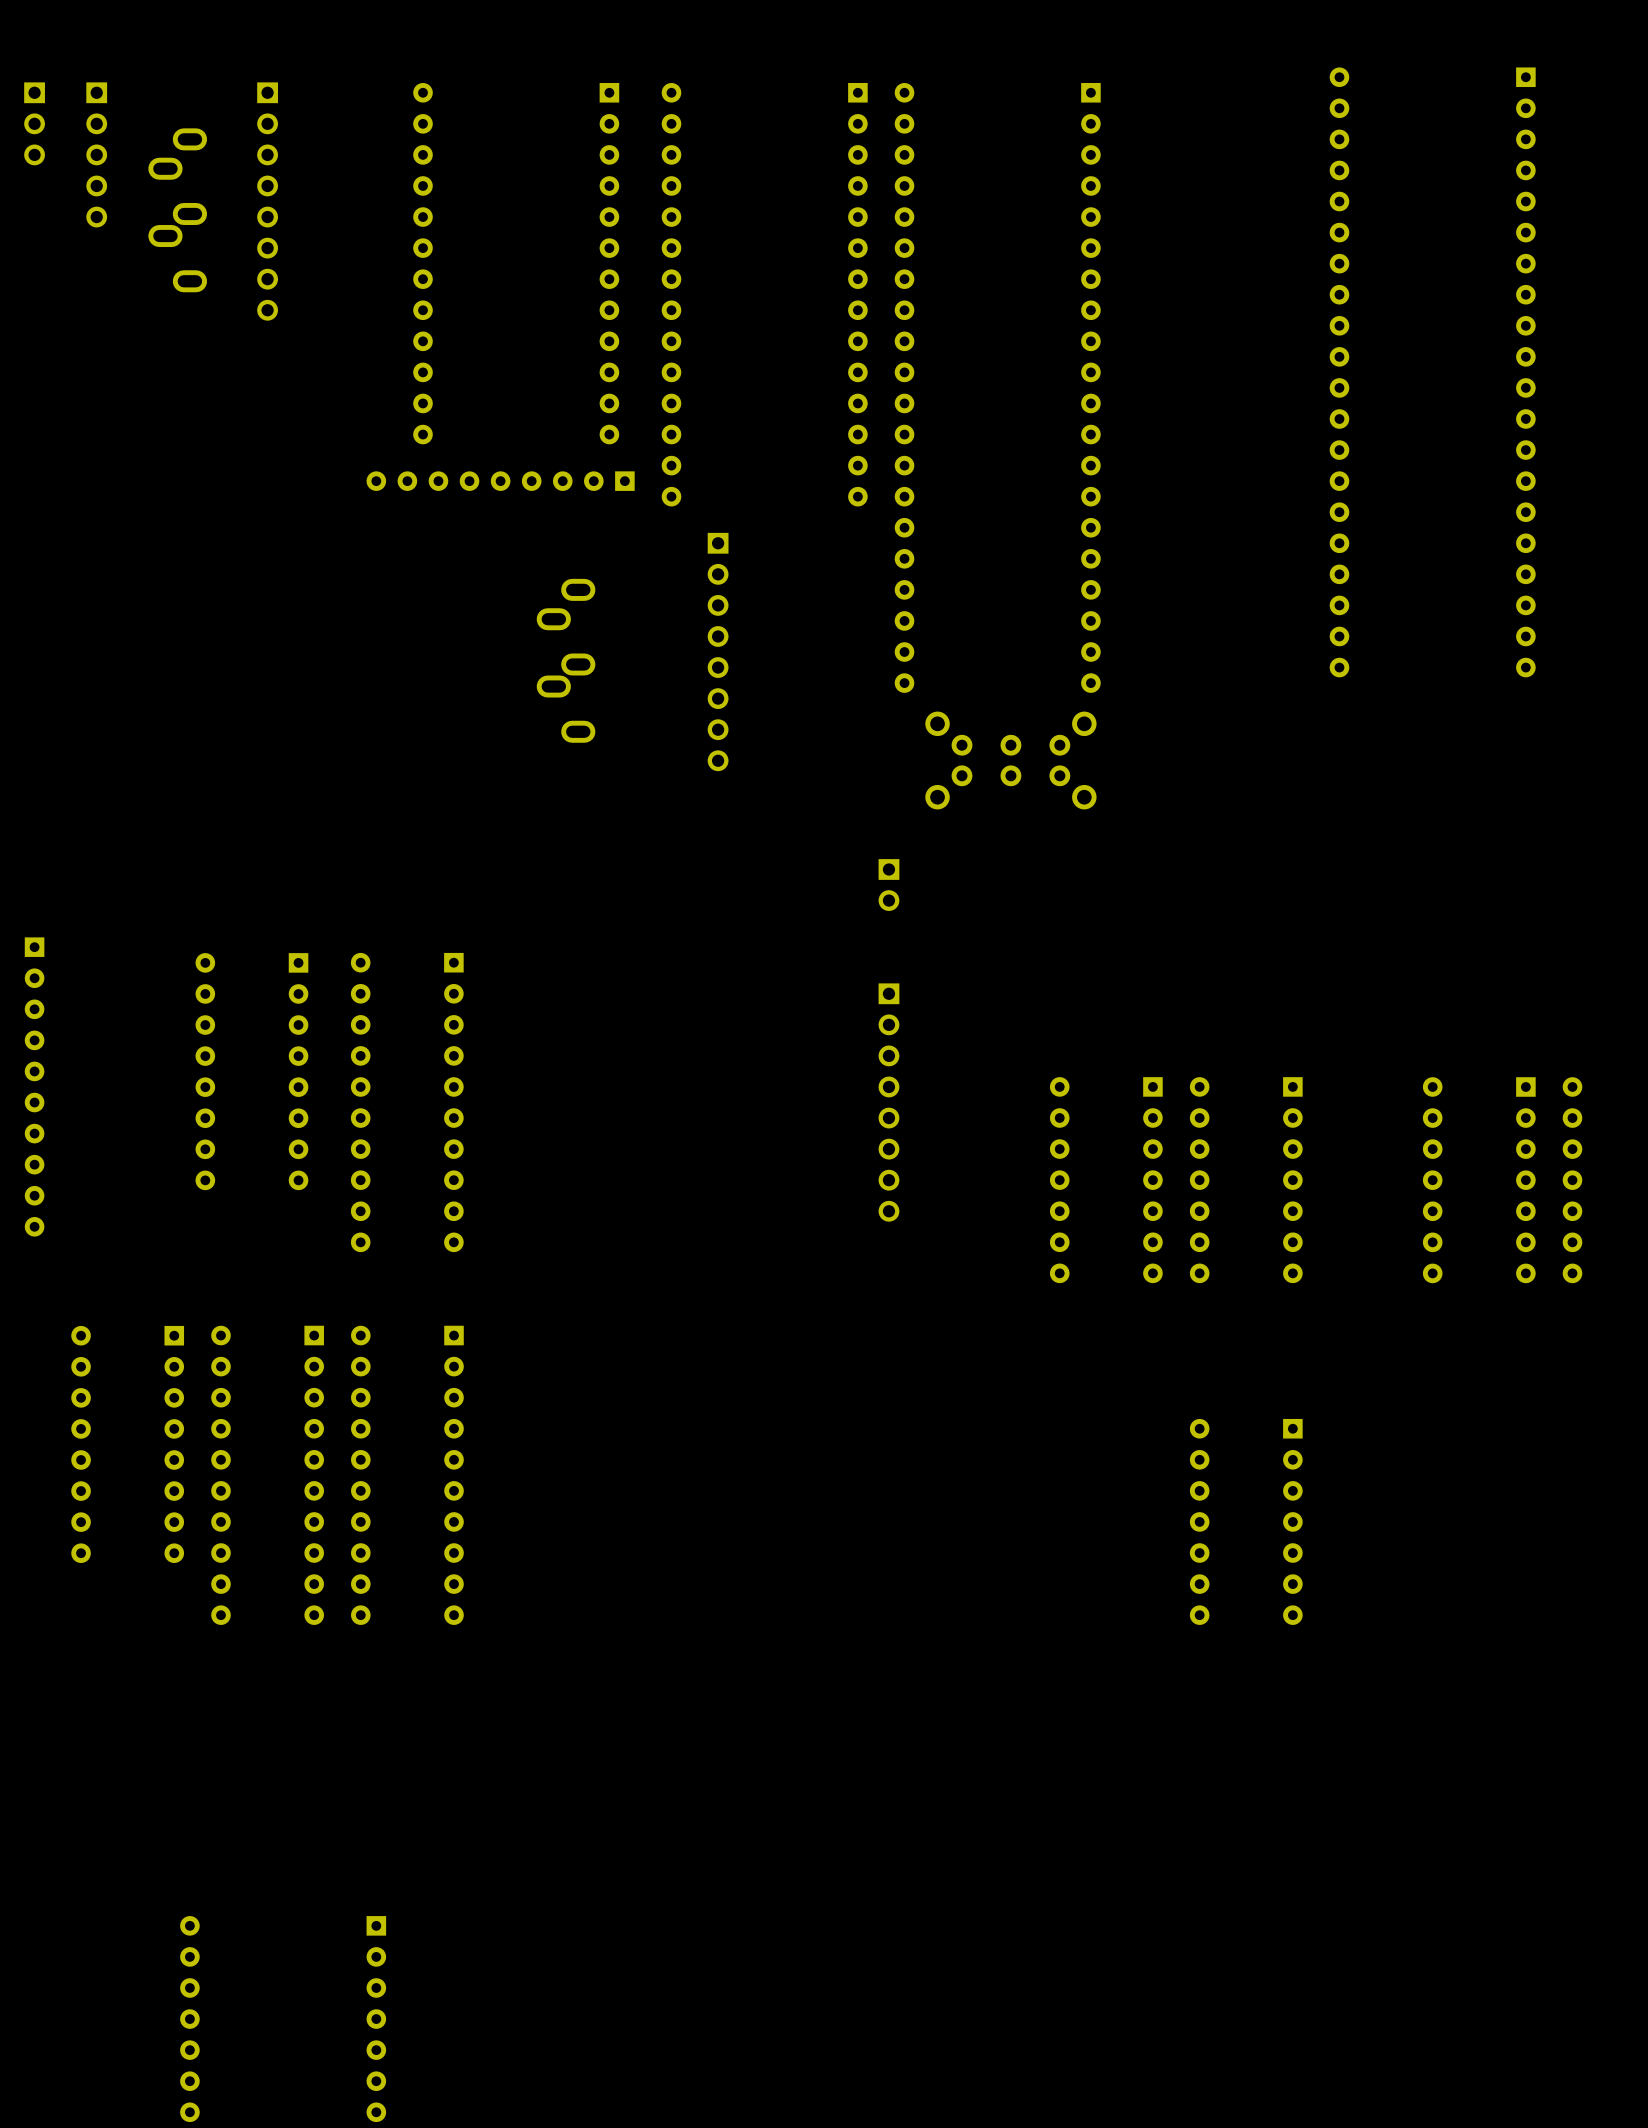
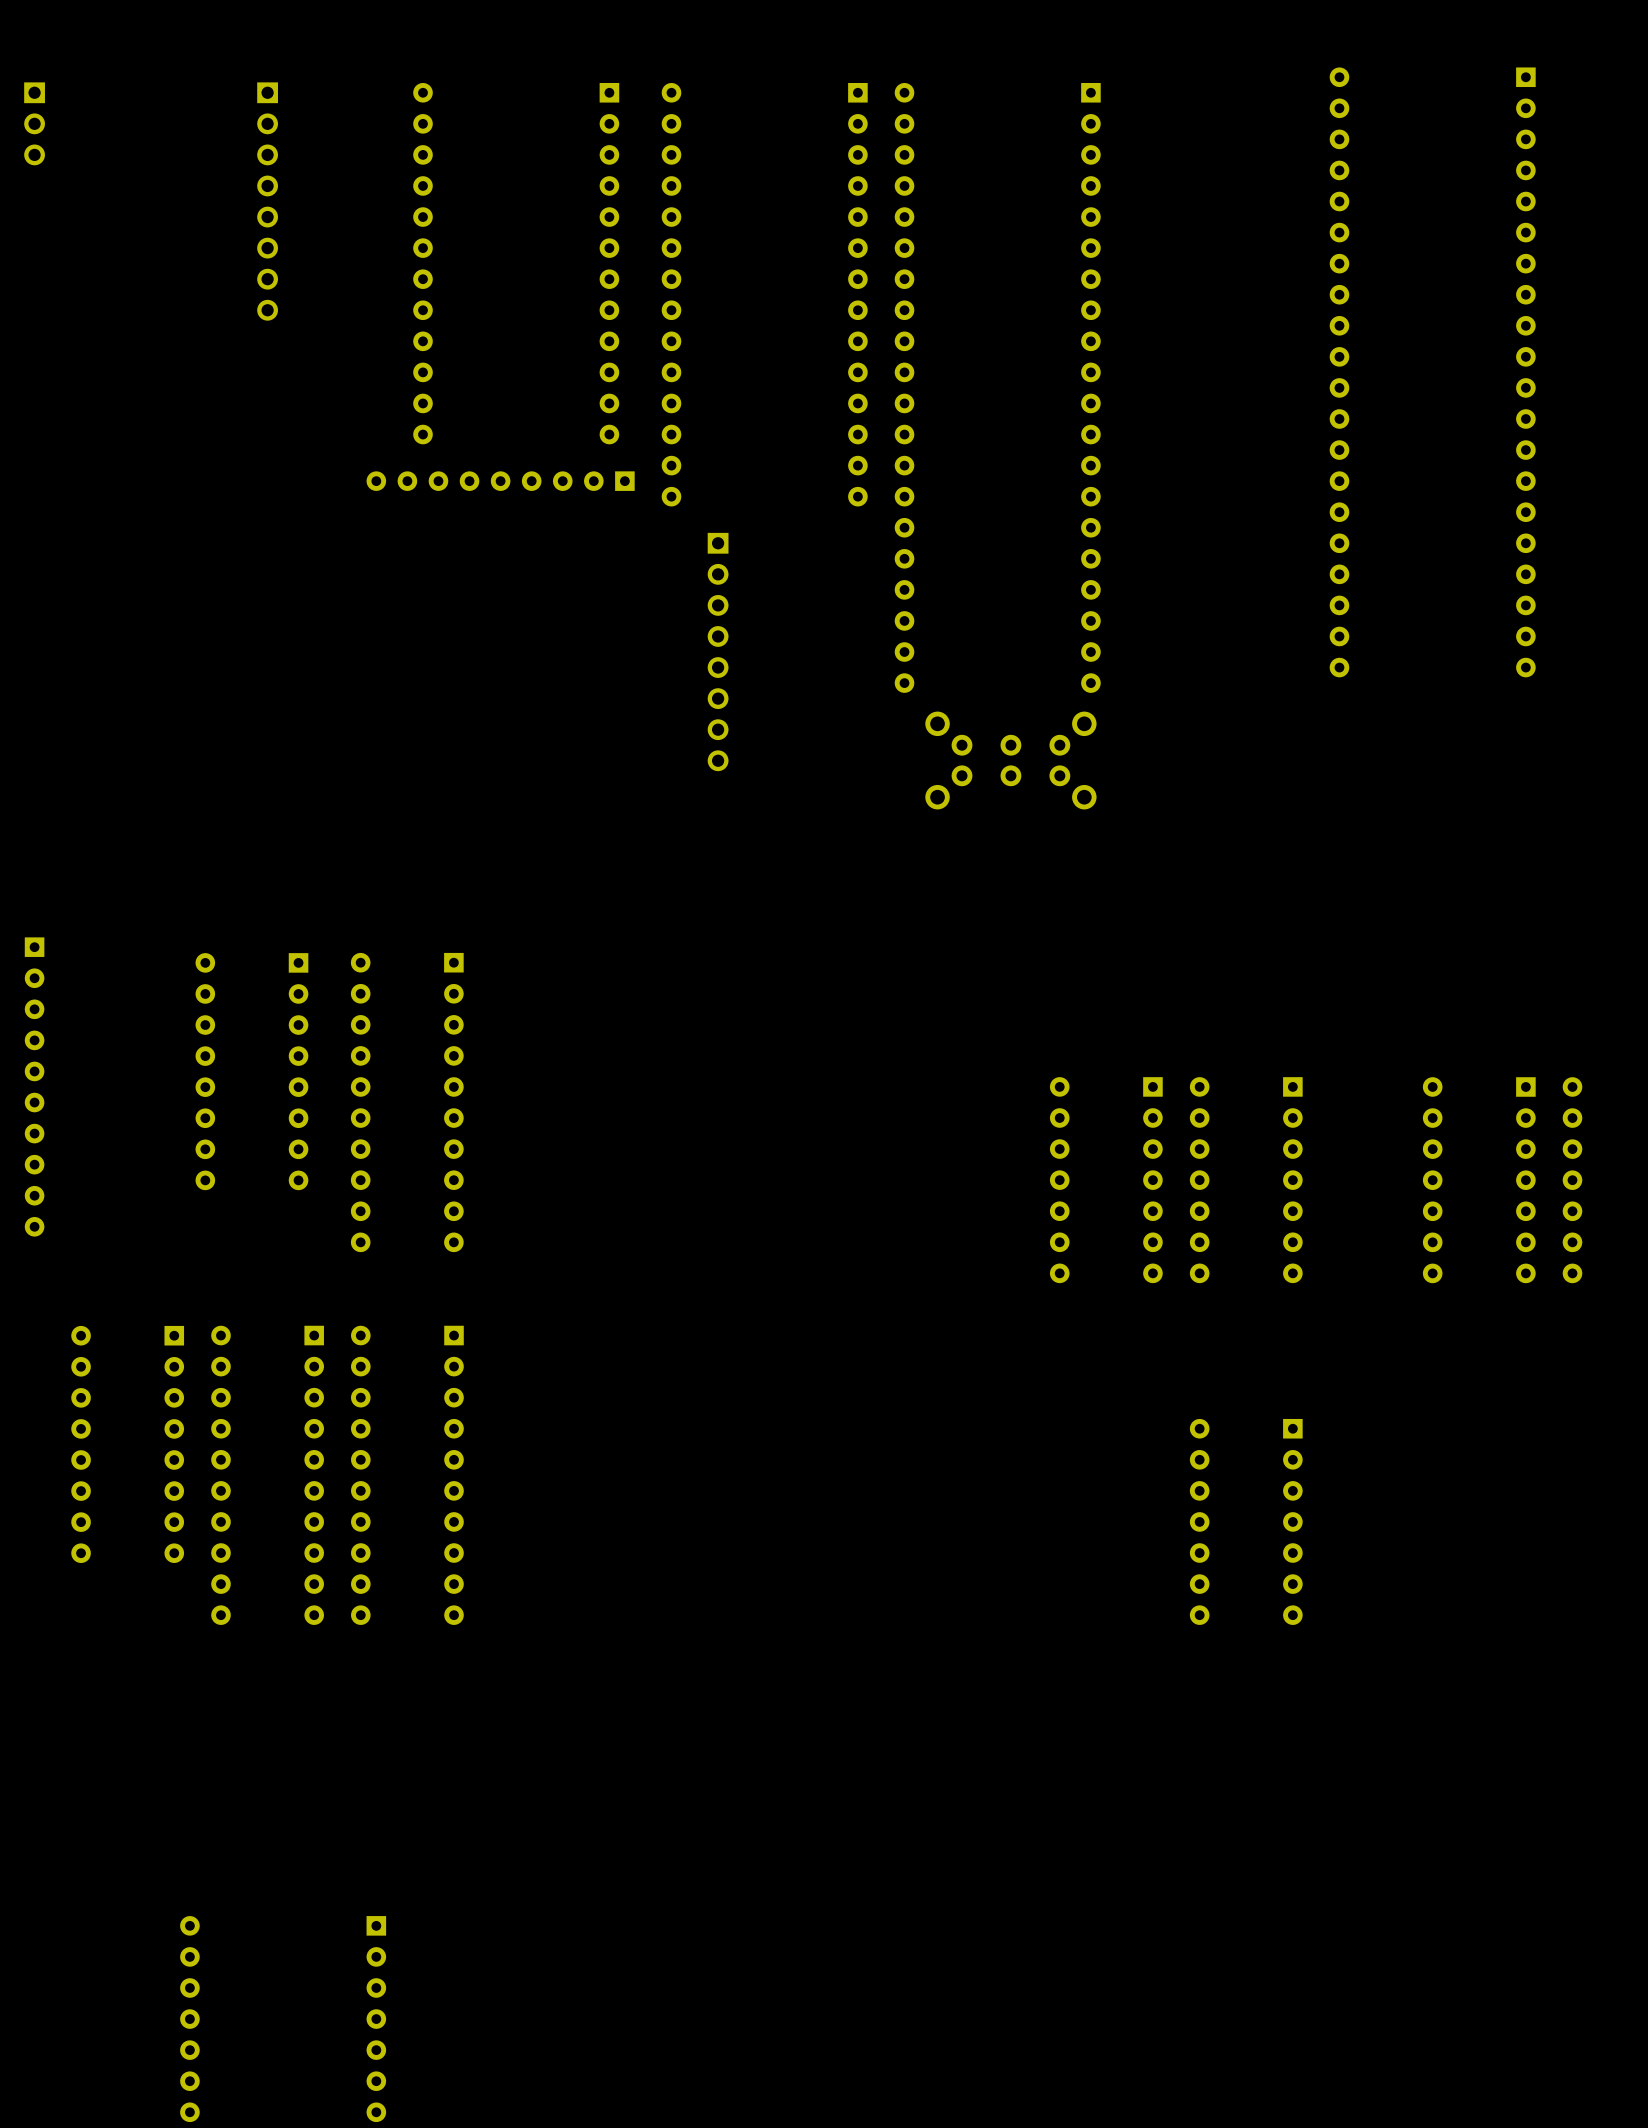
part: (96, 154) -> none
part: (177, 210) -> none
part: (566, 660) -> none
part: (888, 885) -> none
part: (888, 1102) -> none

